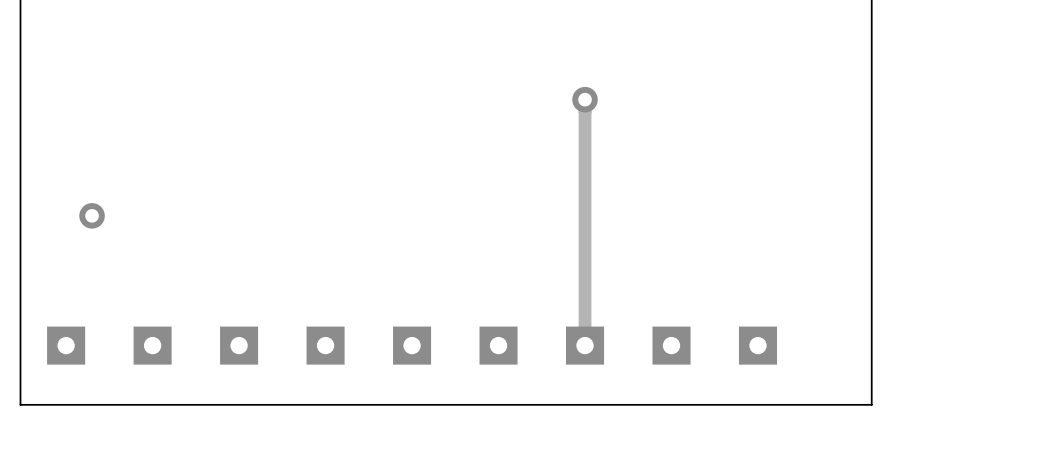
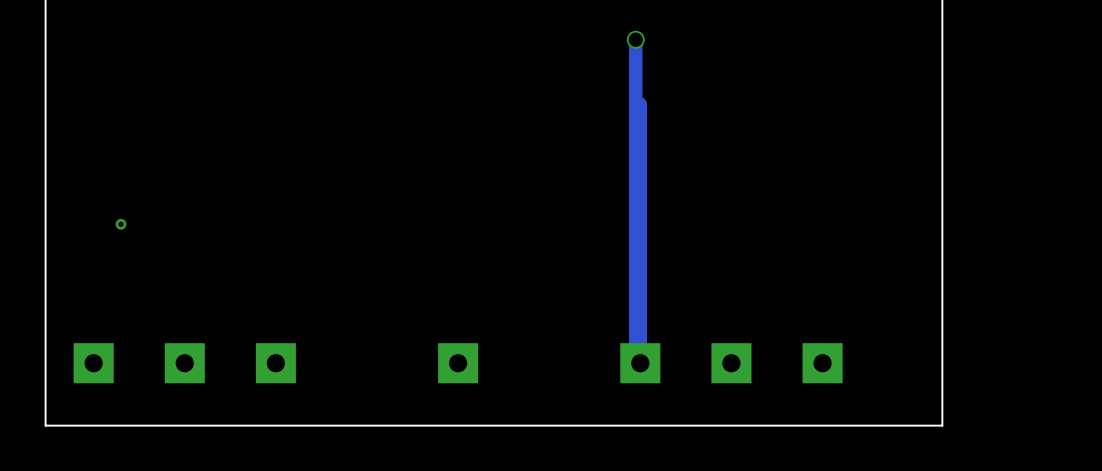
track: none -> (635, 39) (635, 358)
via: none -> (635, 39)
via: (585, 99) -> none
via size: [79, 203, 105, 229] -> [115, 218, 127, 230]
part: (325, 345) -> none
part: (498, 345) -> none

